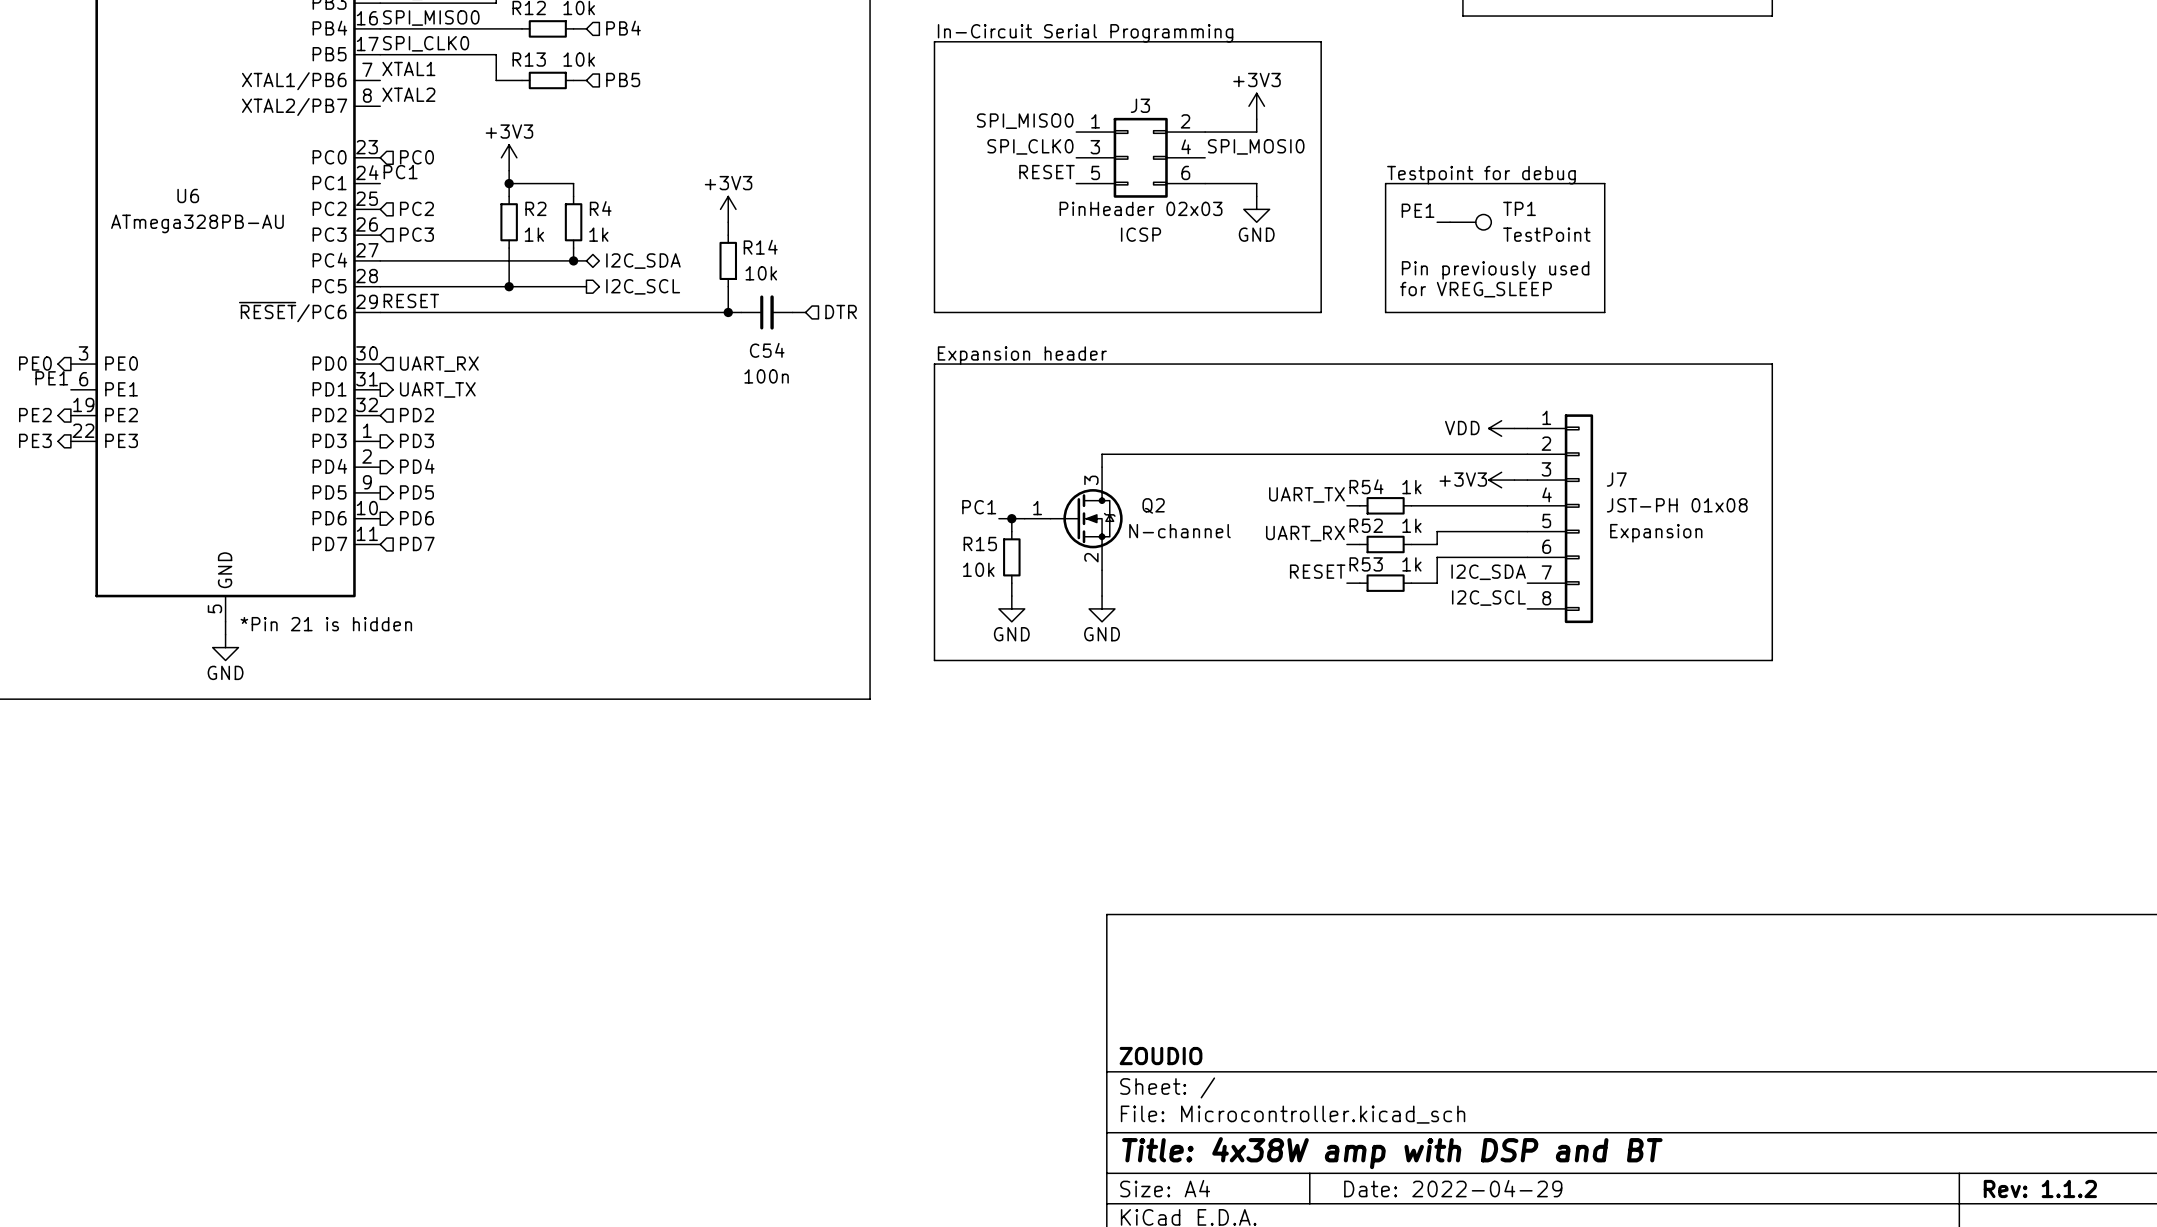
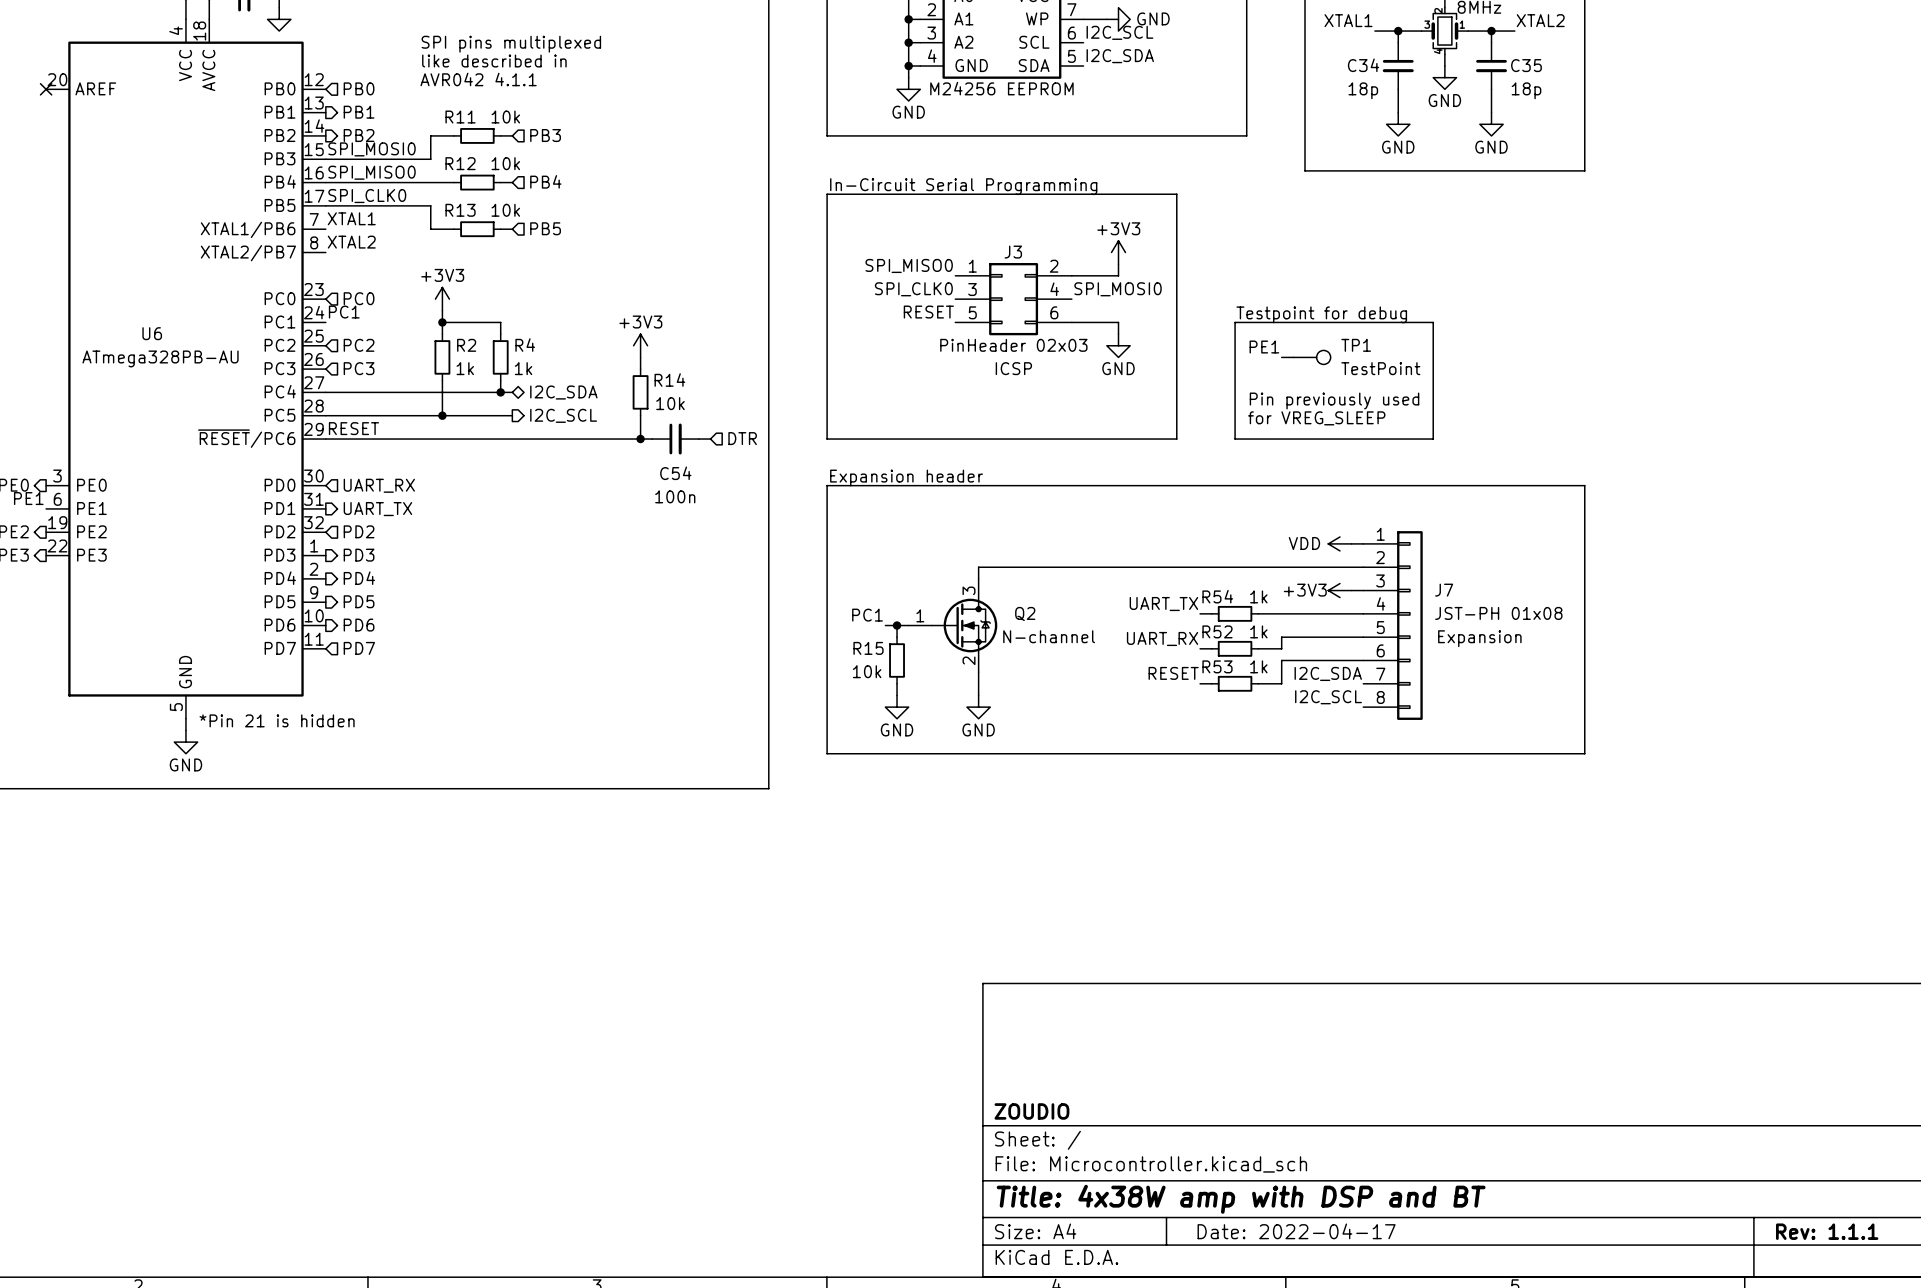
title block: Date: 2022-04-29 (1453, 1188) -> Date: 2022-04-17 (1296, 1231)
title block: Rev: 1.1.2 (2040, 1188) -> Rev: 1.1.1 (1827, 1231)

